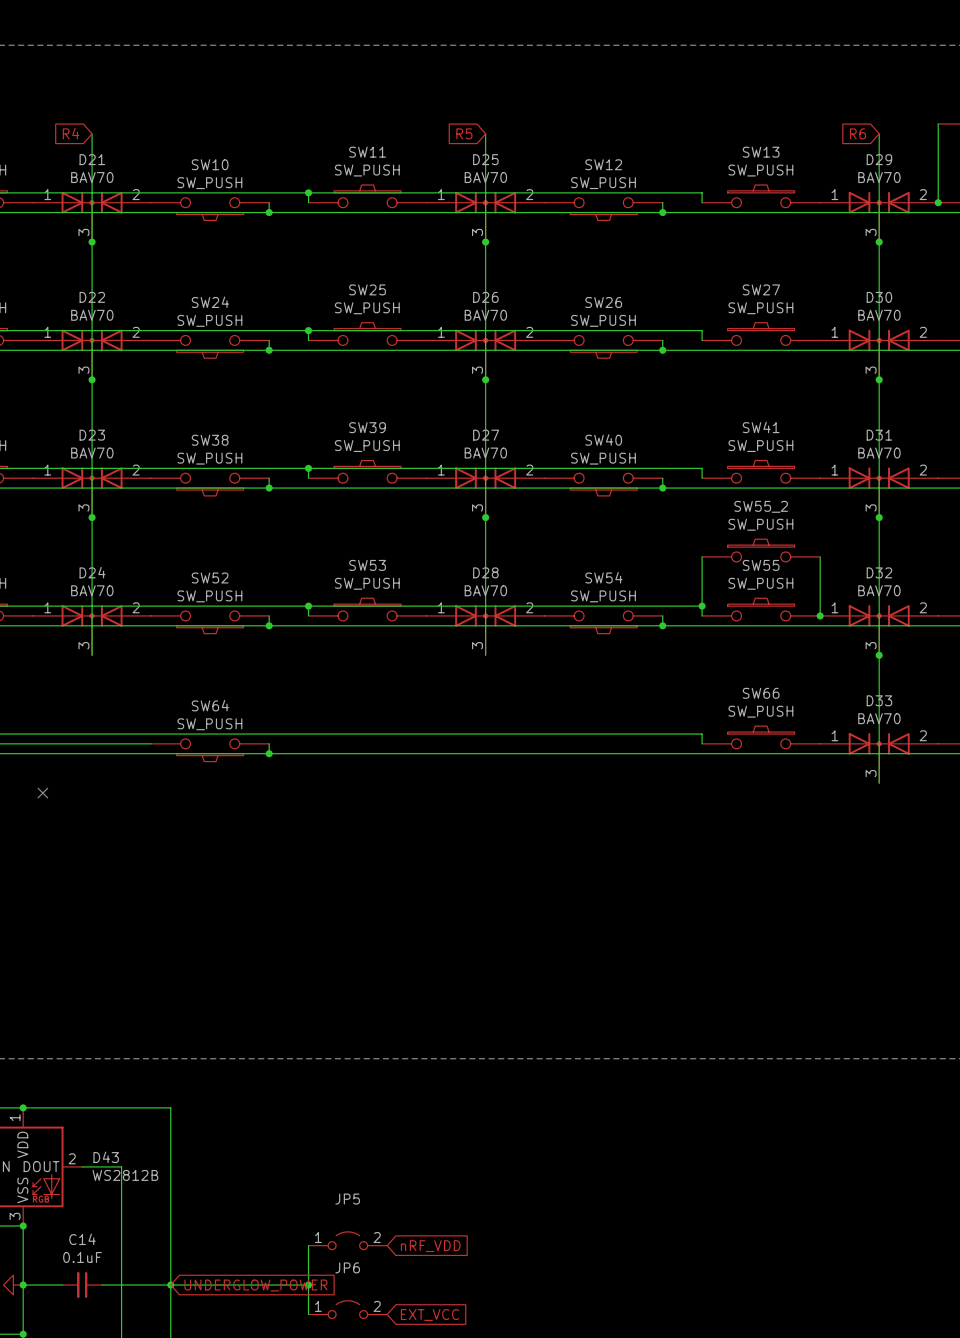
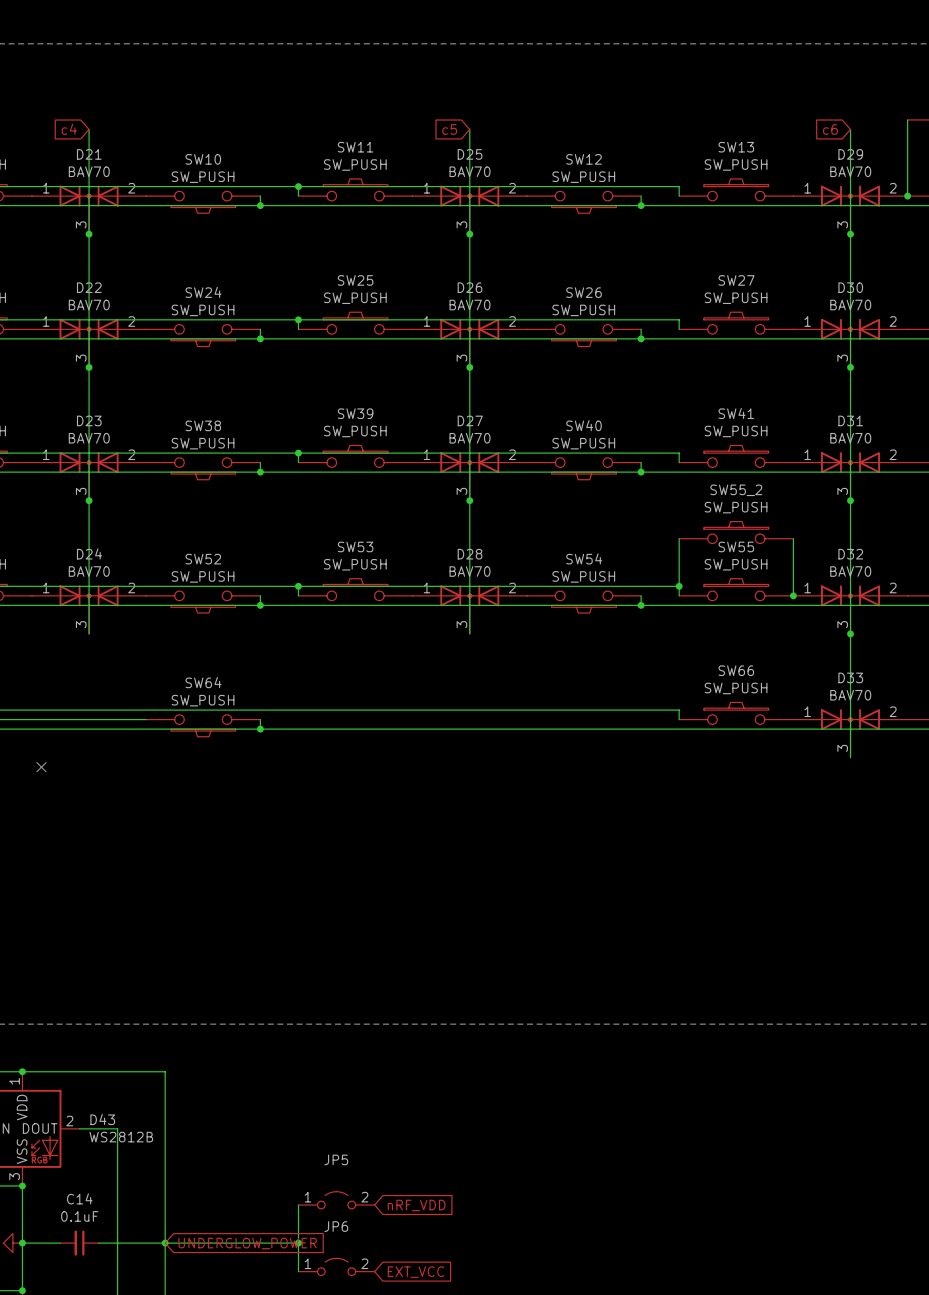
global label: R4 (71, 133) -> c4 (69, 129)
global label: R5 (464, 133) -> c5 (449, 129)
global label: R6 (857, 133) -> c6 (830, 129)

